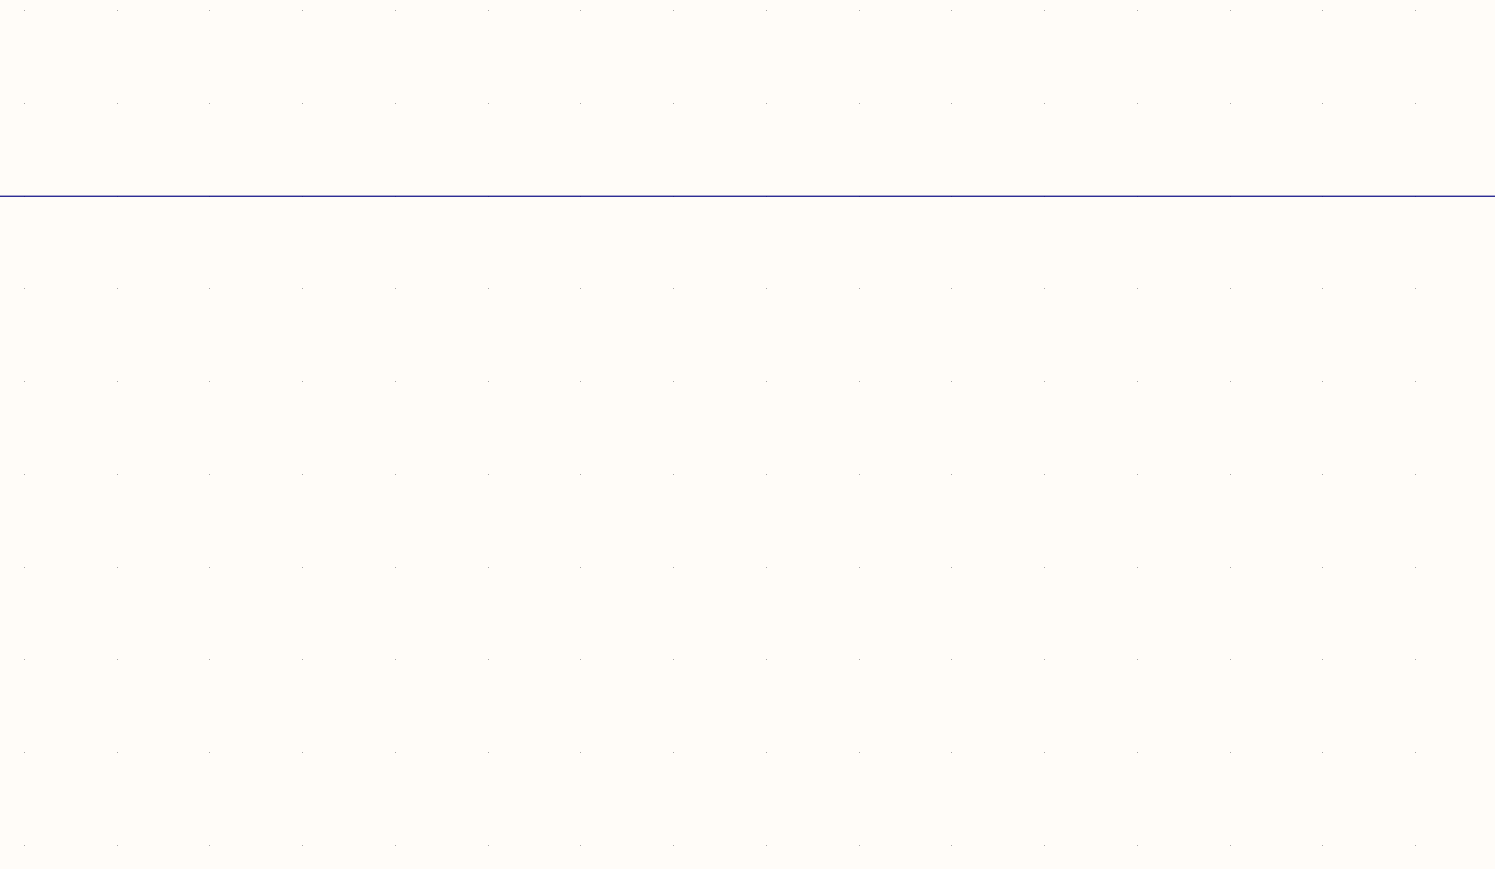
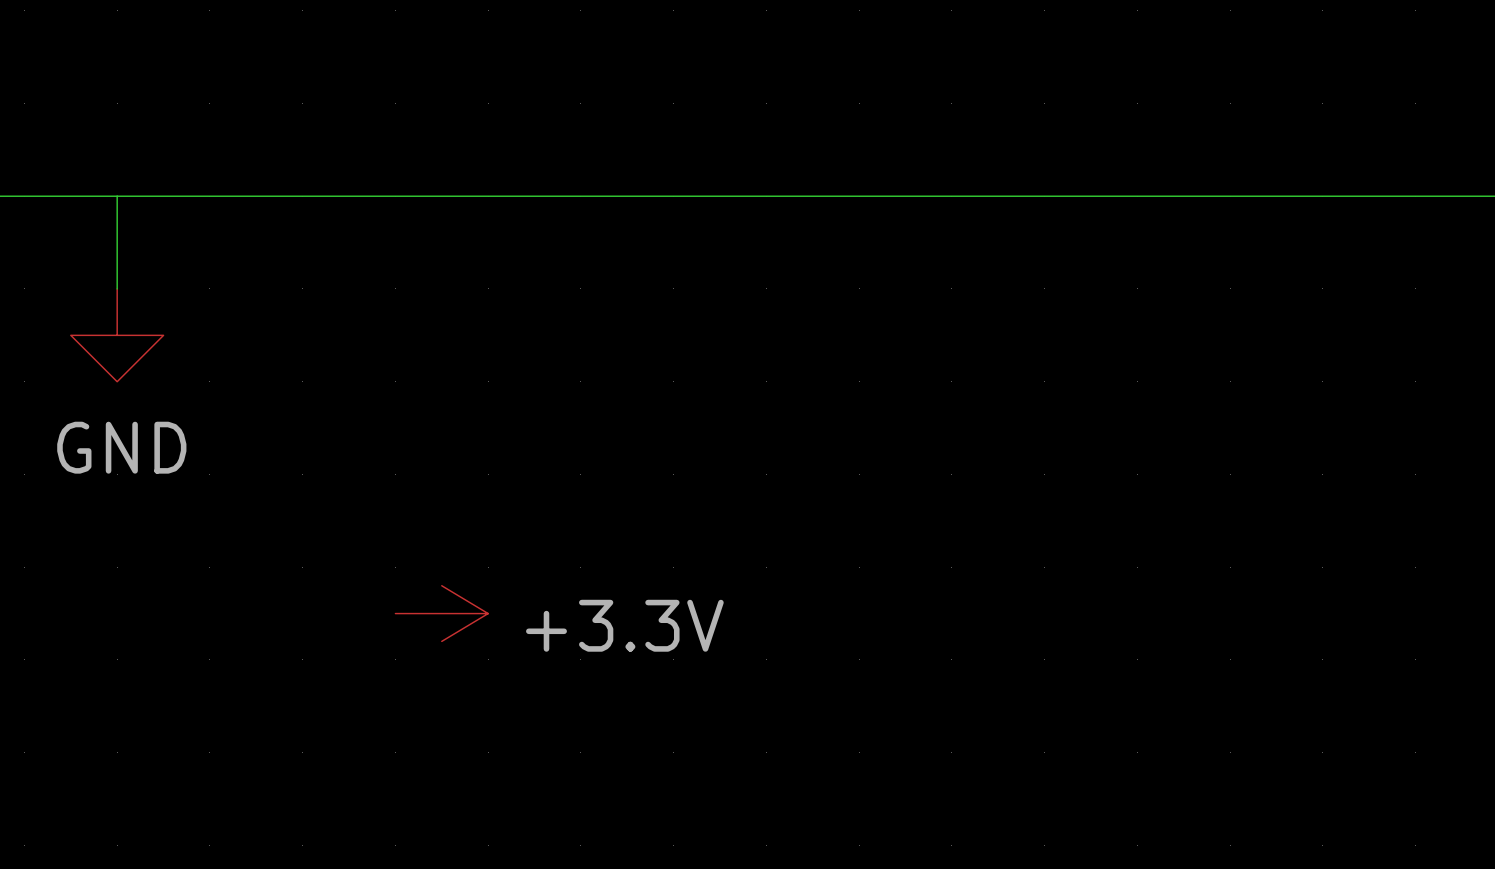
wire: none -> (117, 196) (117, 288)
power symbol: none -> GND (117, 335)
power symbol: none -> +3.3V (441, 613)

